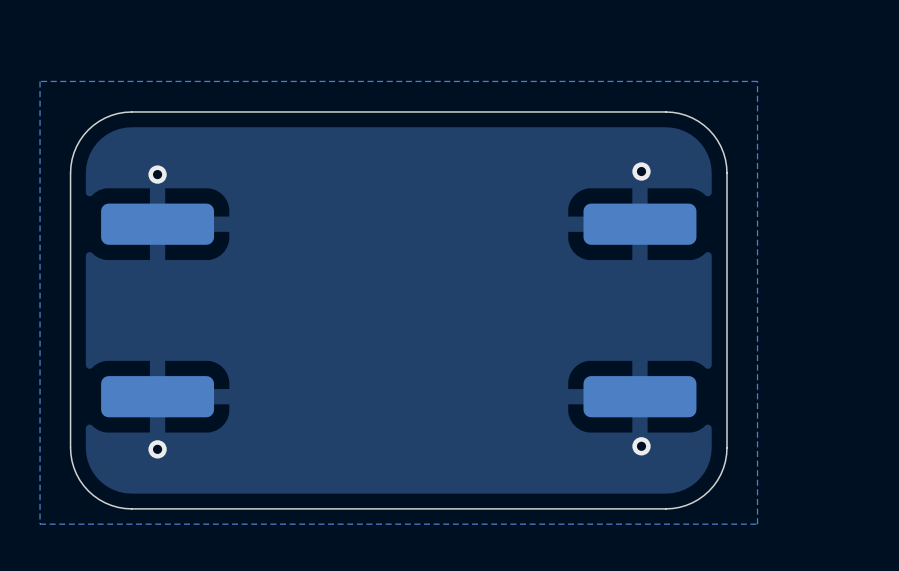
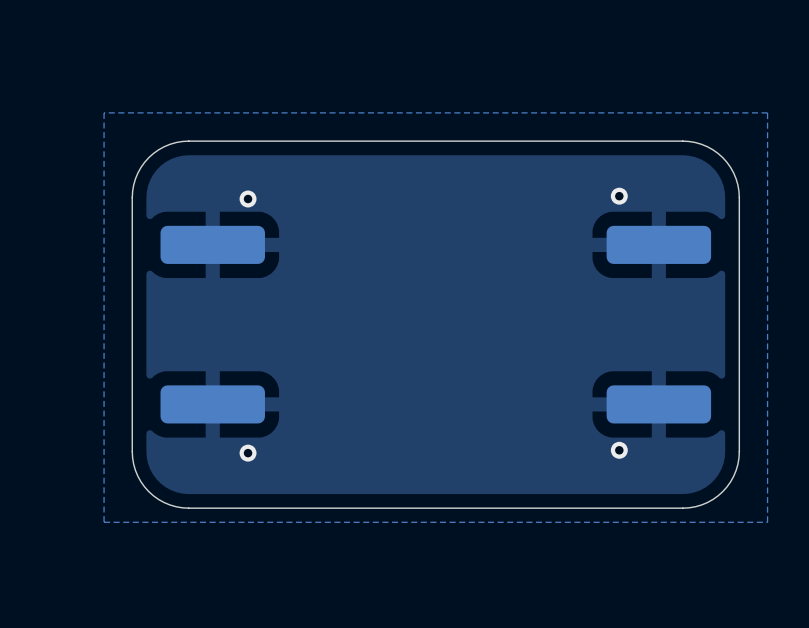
via position: (641, 171) -> (619, 196)
via position: (157, 174) -> (248, 199)
via position: (641, 446) -> (619, 450)
via position: (157, 449) -> (248, 453)

